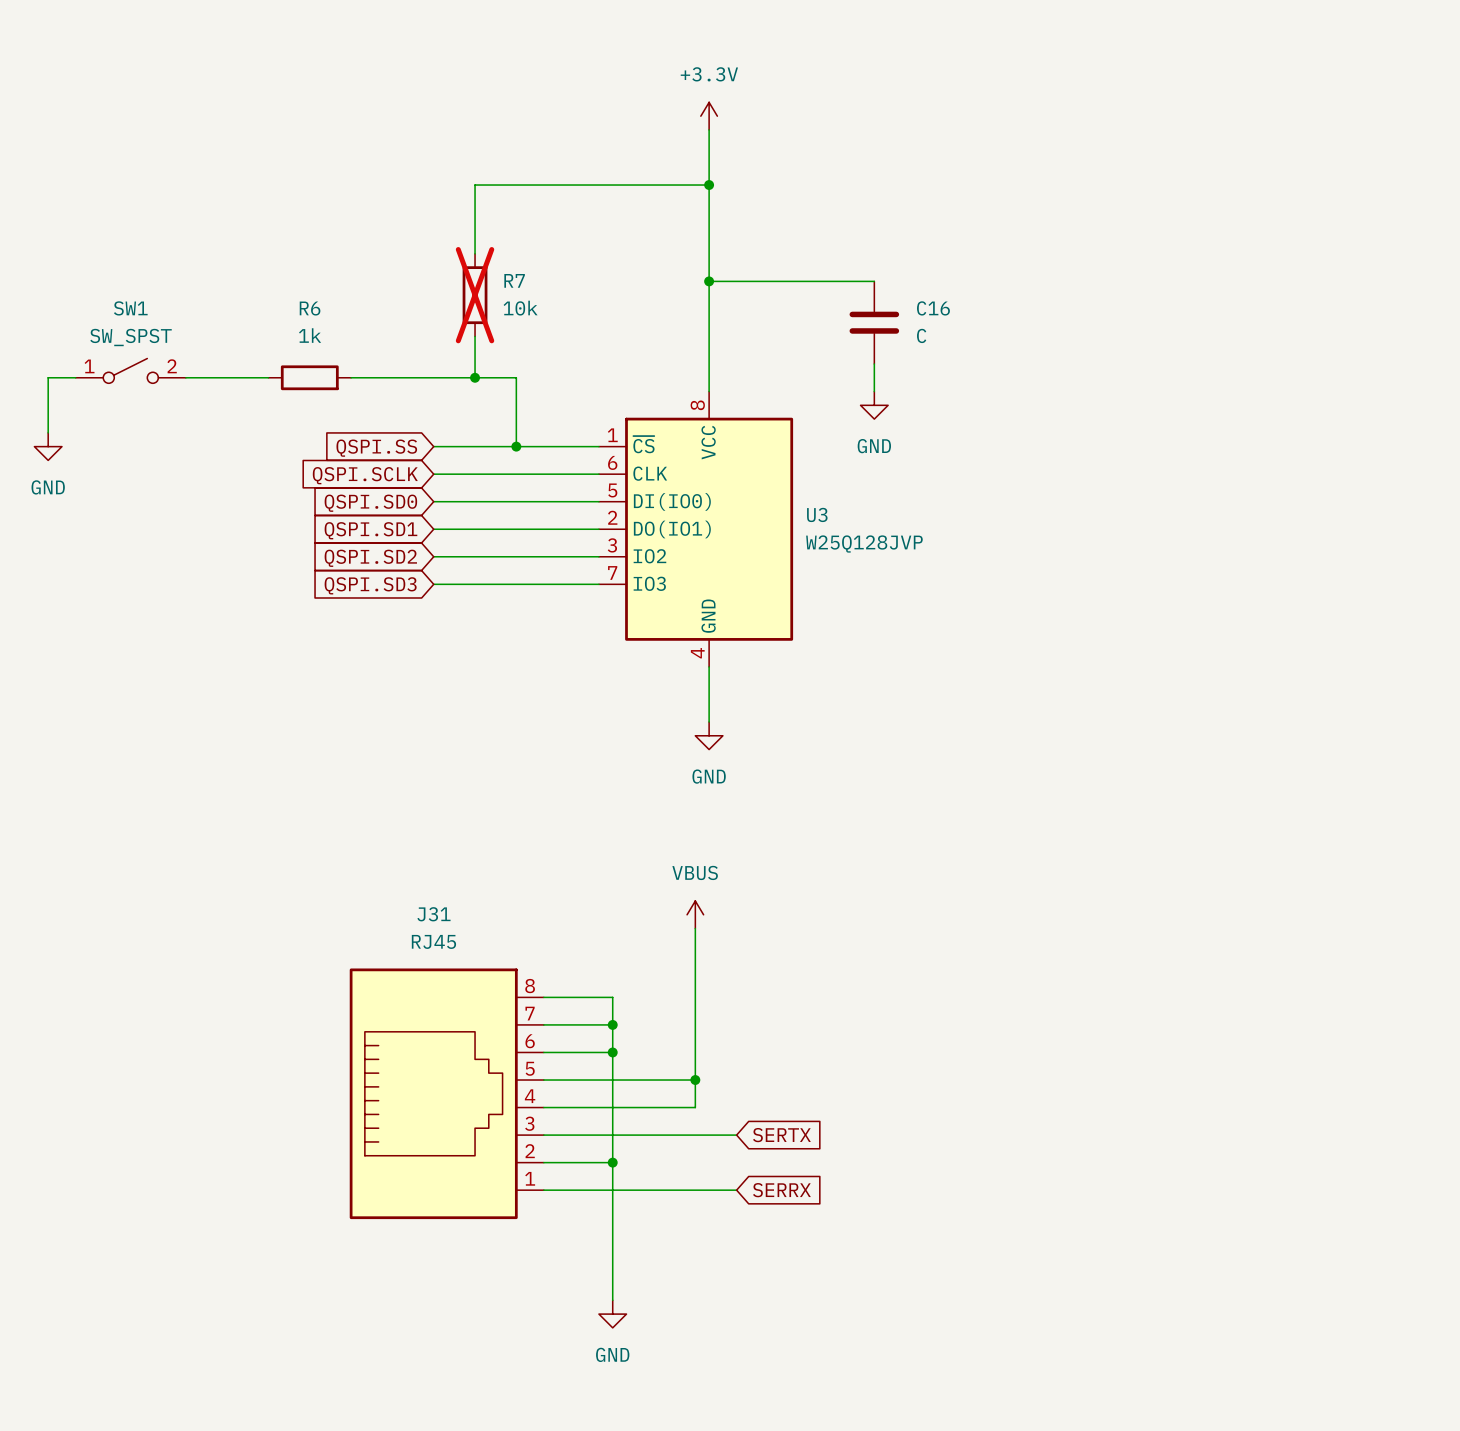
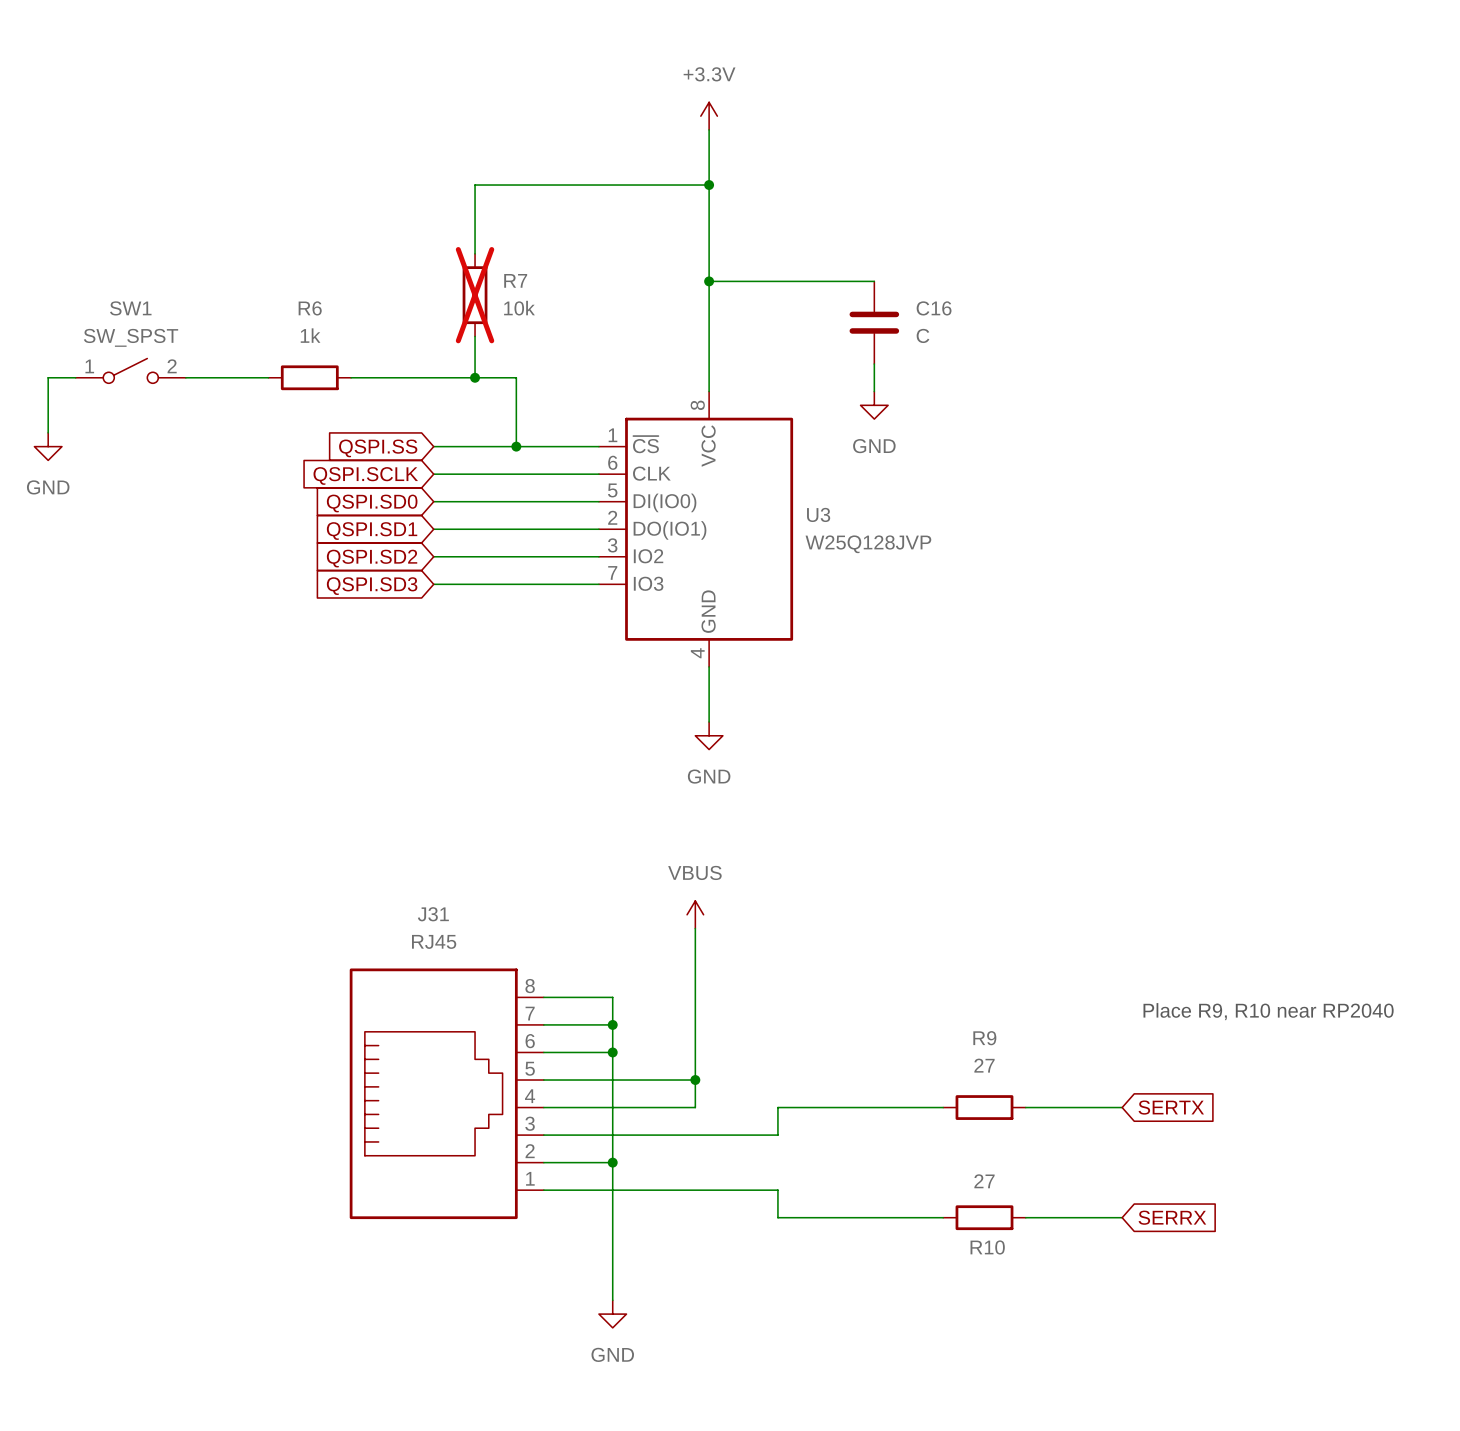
text: none -> Place R9, R10 near RP2040 (1268, 1011)
wire: none -> (943, 1107) (777, 1107) (777, 1135) (736, 1135)
R9: none -> 27 (984, 1107)
wire: none -> (1025, 1107) (1122, 1107)
global label: none -> SERTX (1171, 1107)
global label: SERTX (781, 1135) -> none
wire: none -> (736, 1190) (777, 1190) (777, 1217) (943, 1217)
global label: SERRX (781, 1190) -> none
R10: none -> 27 (984, 1217)
wire: none -> (1025, 1217) (1122, 1217)
global label: none -> SERRX (1172, 1217)

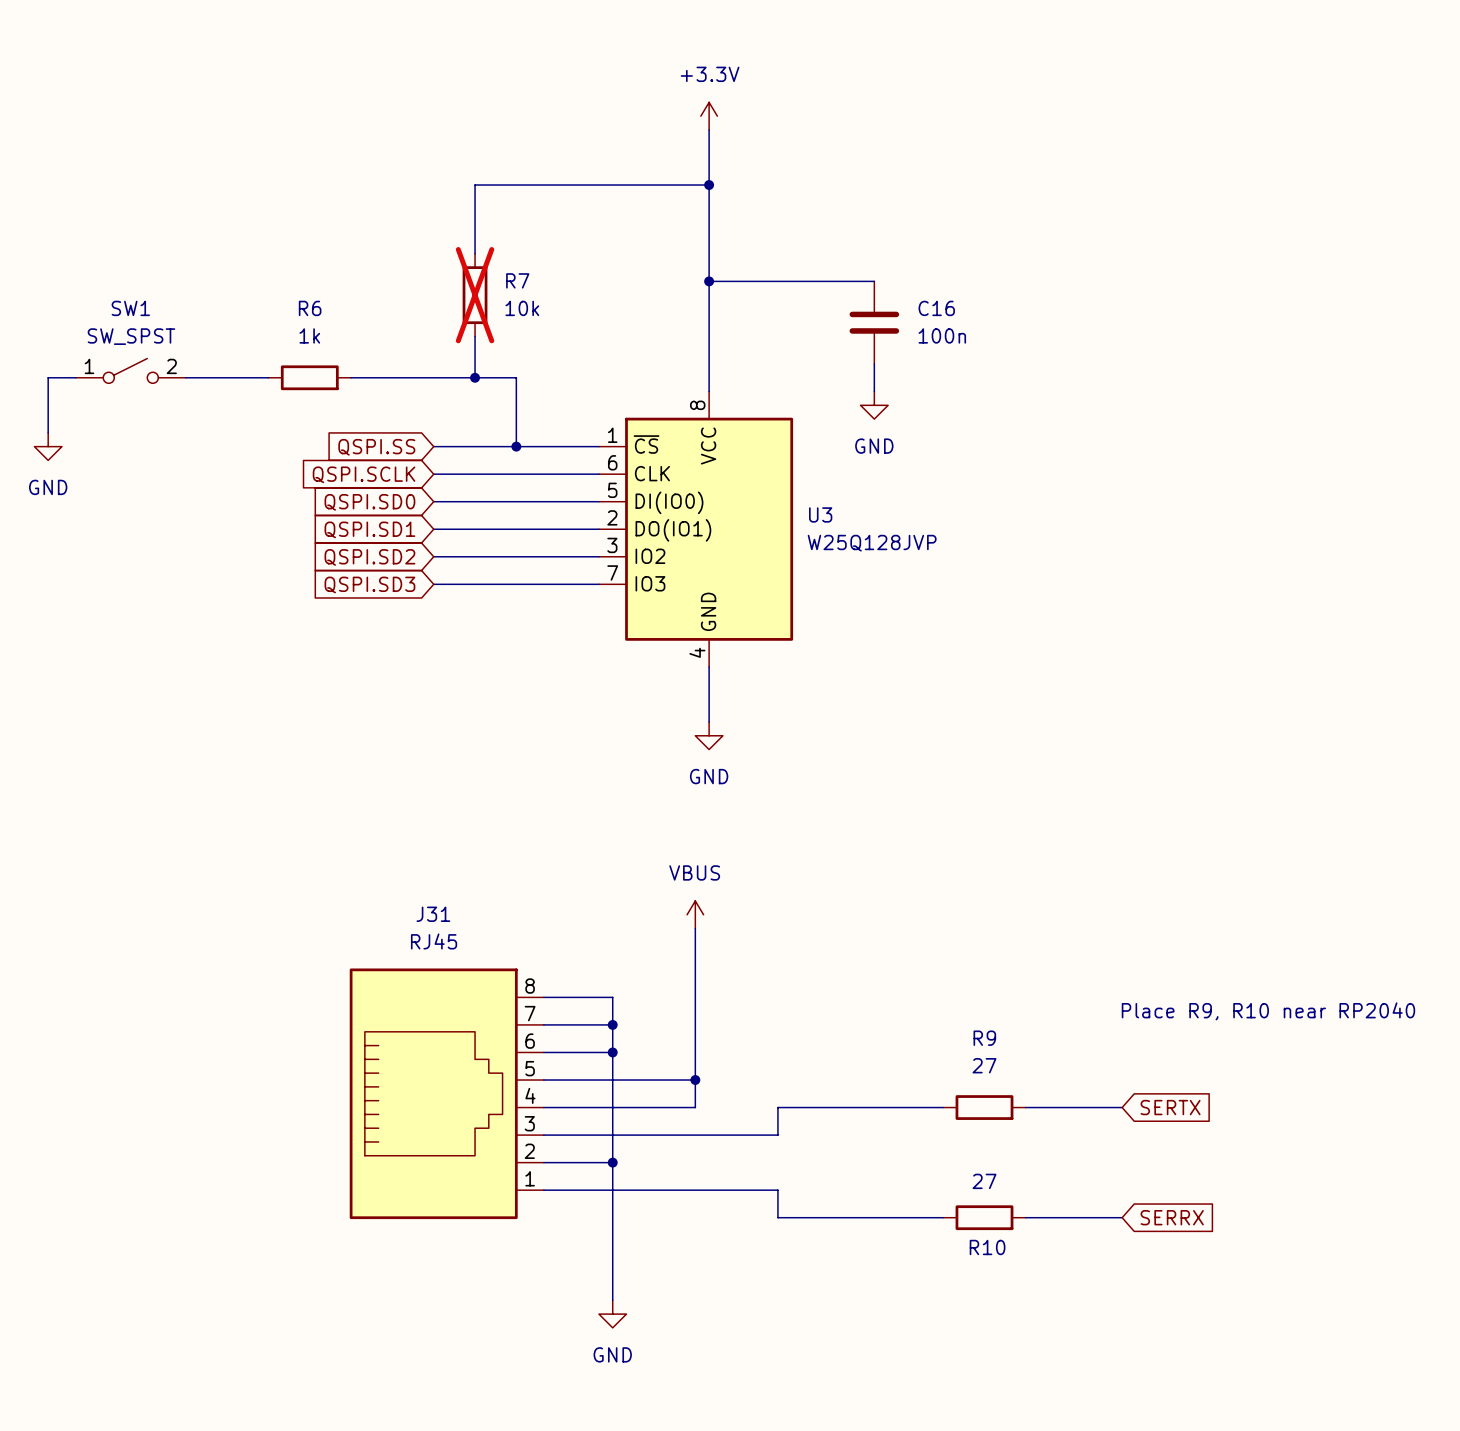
C16 value: C (923, 335) -> 100n (942, 335)

